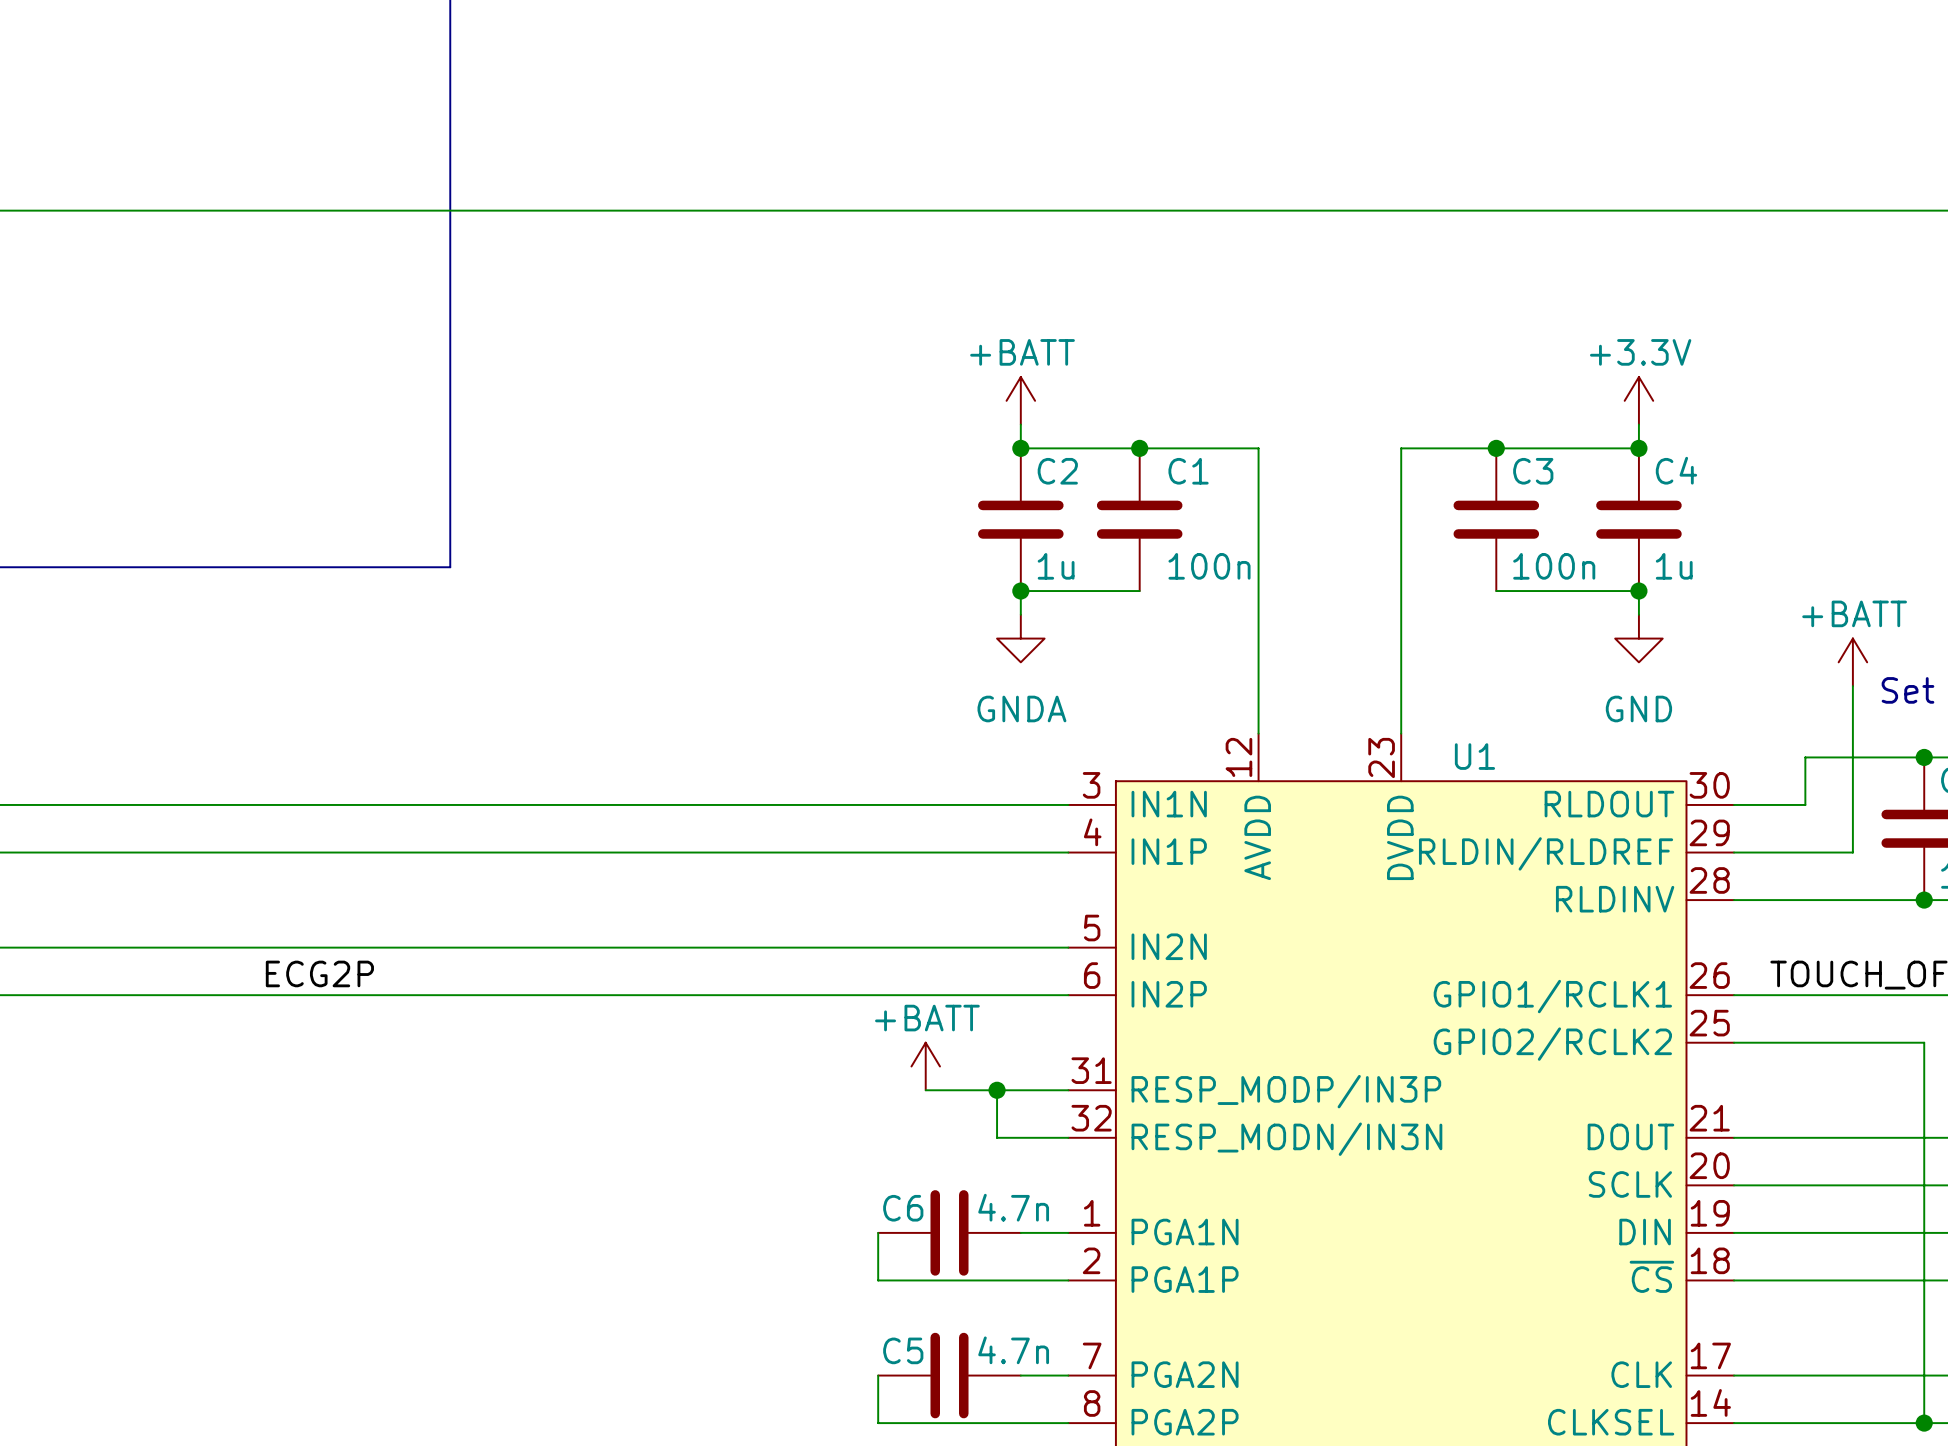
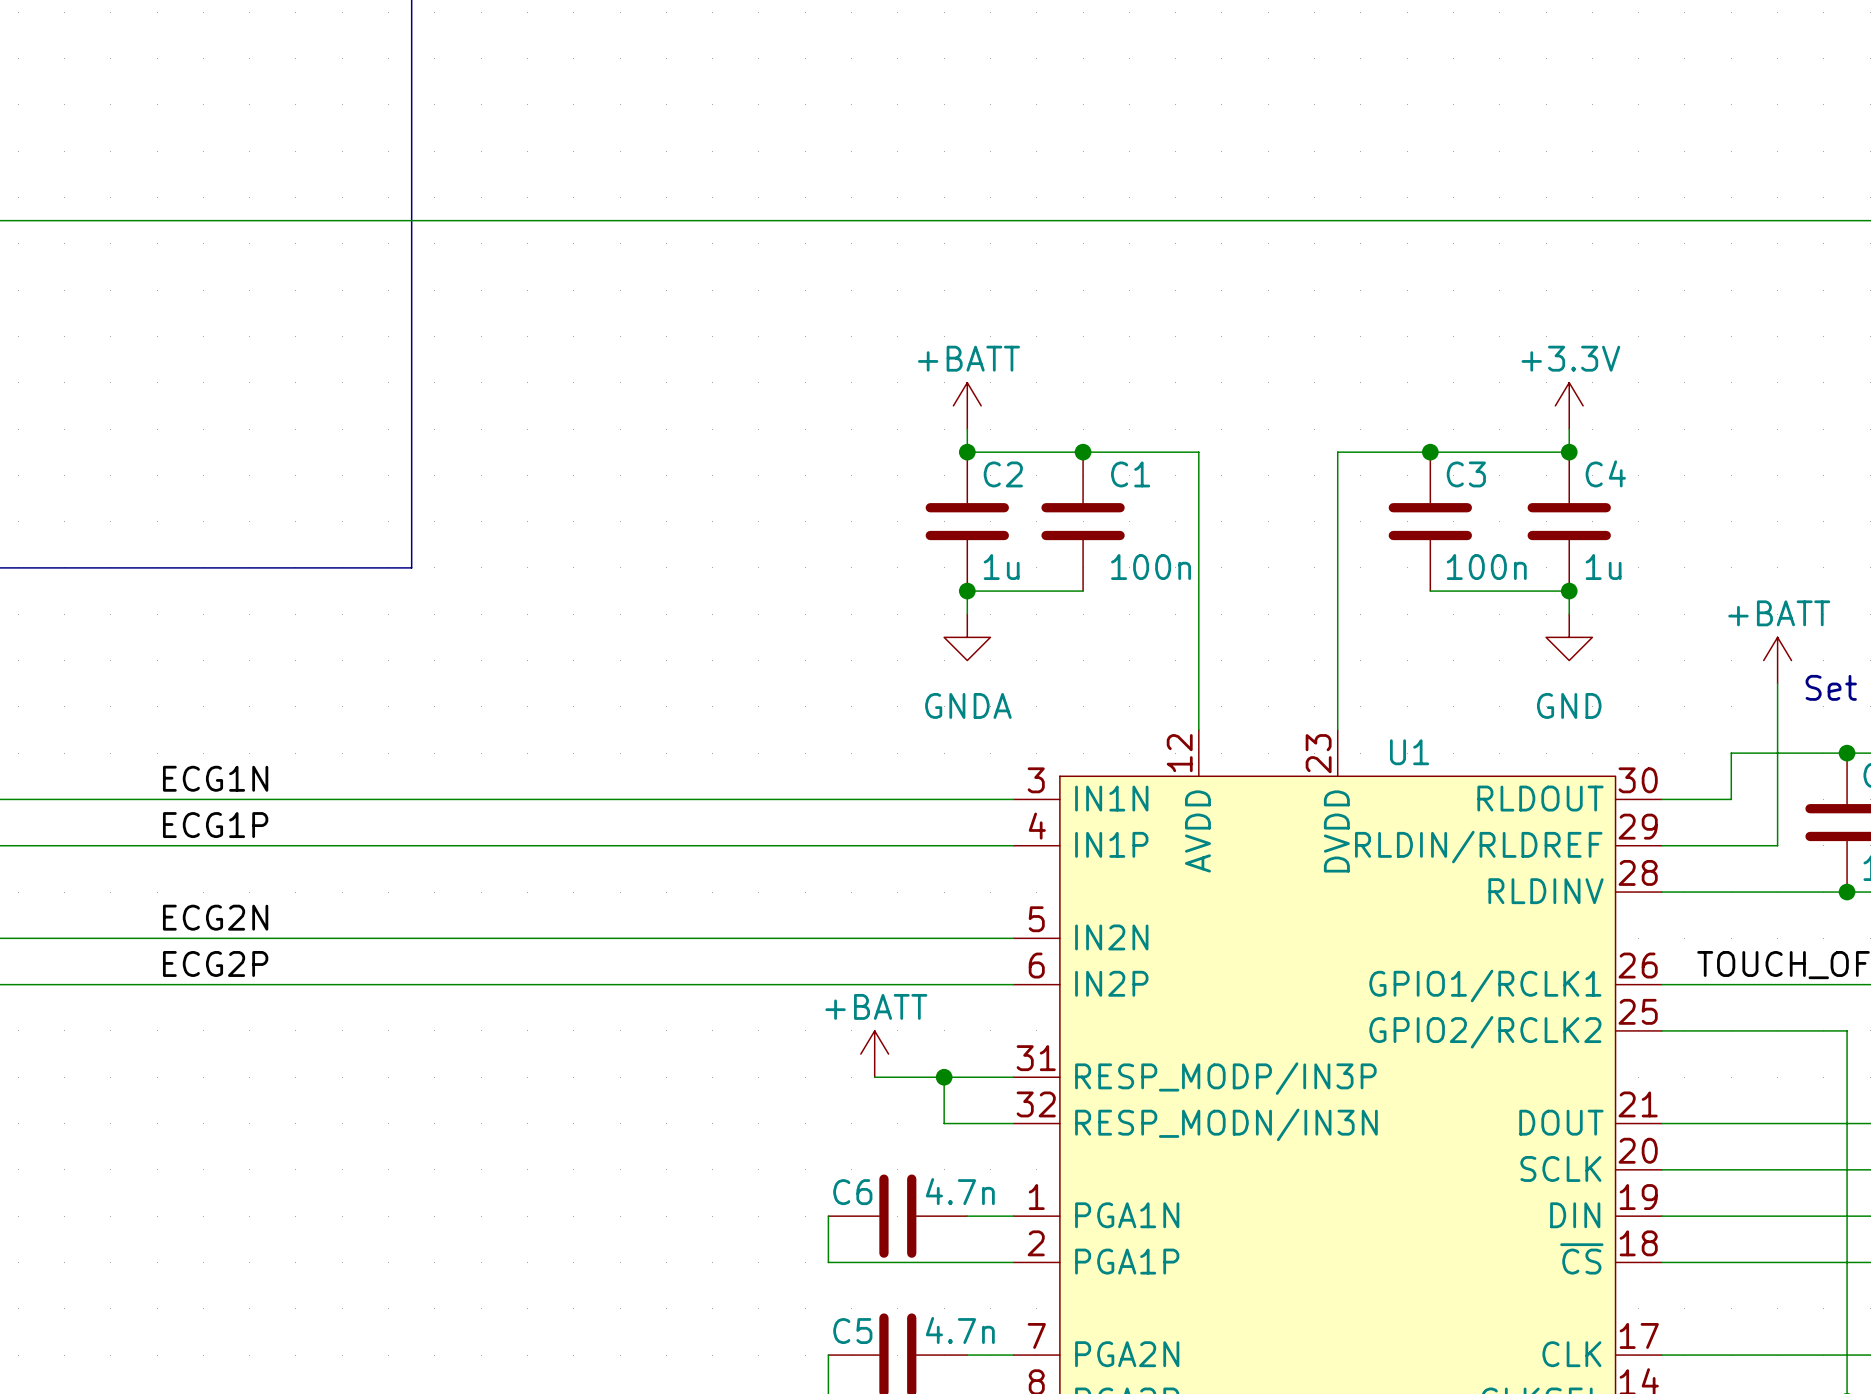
label: none -> ECG1N (215, 778)
label: none -> ECG1P (215, 825)
label: none -> ECG2N (215, 917)
label position: ECG2P (319, 973) -> ECG2P (215, 963)

